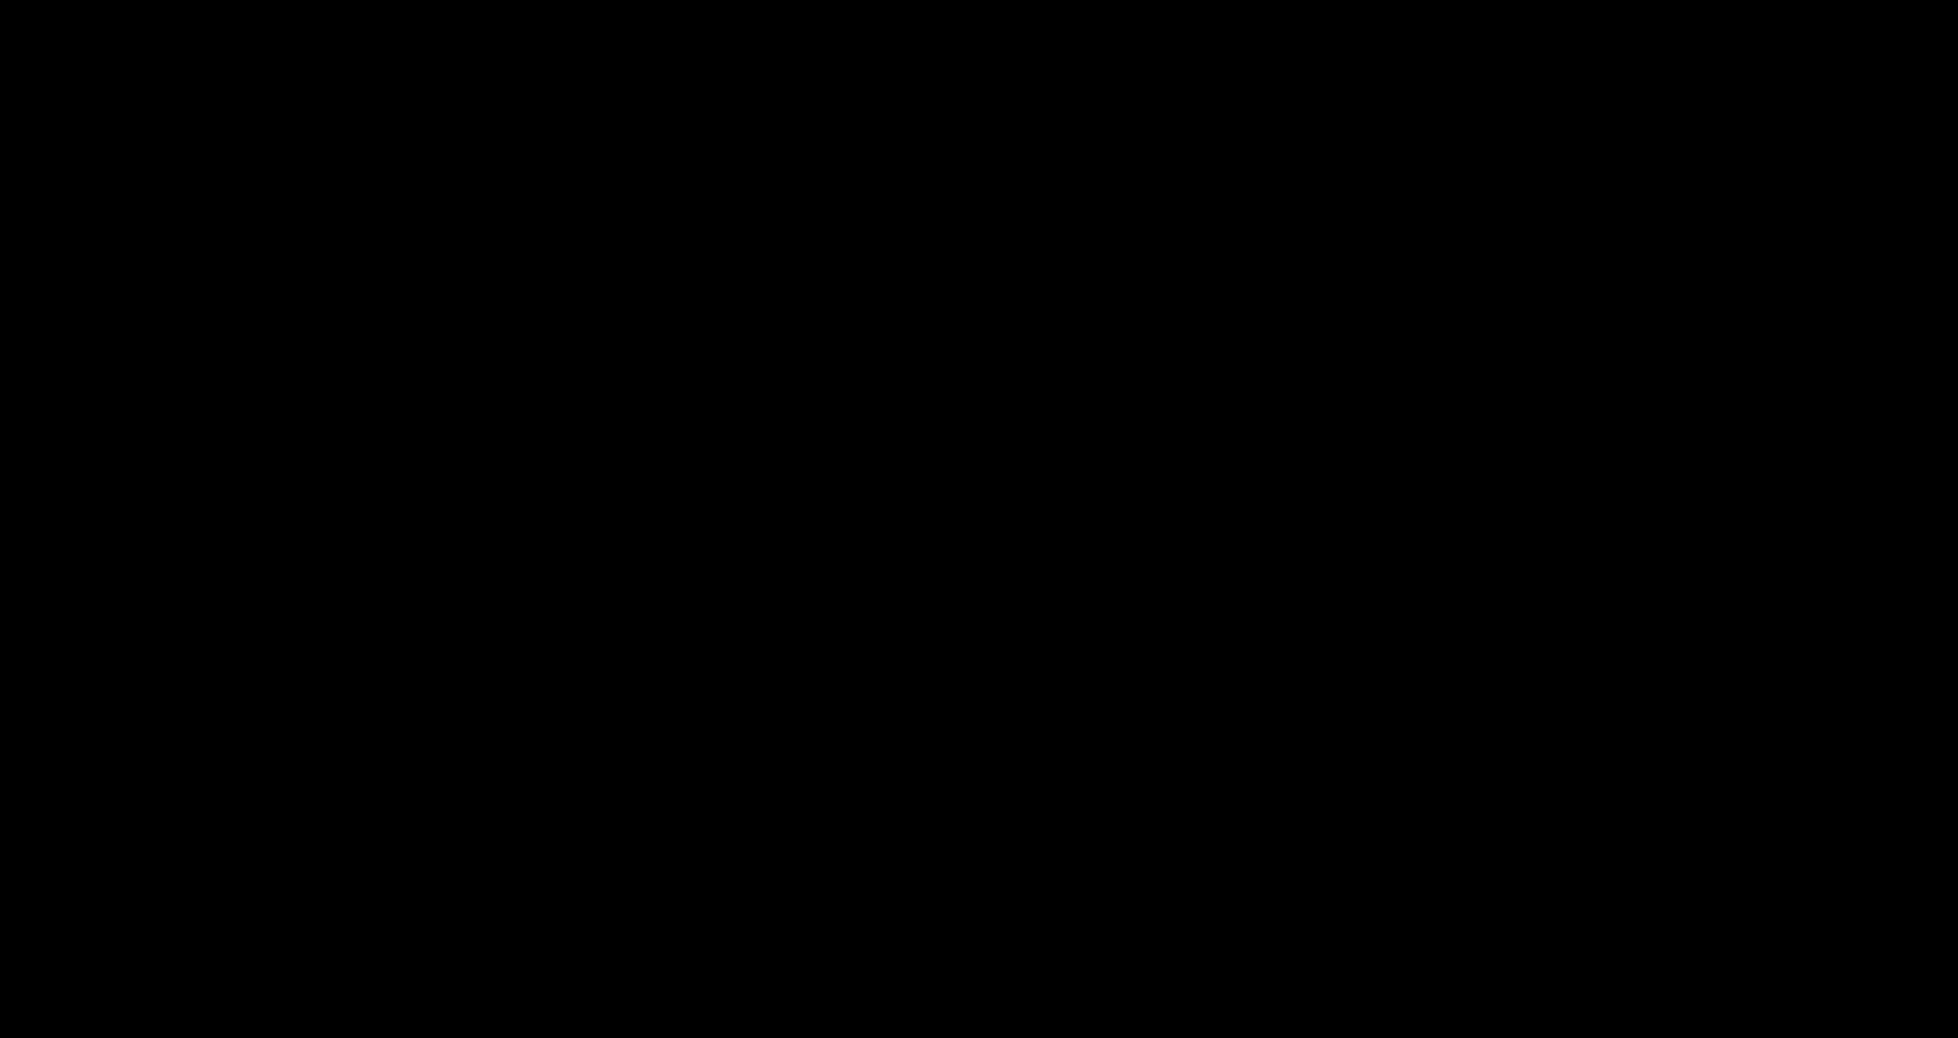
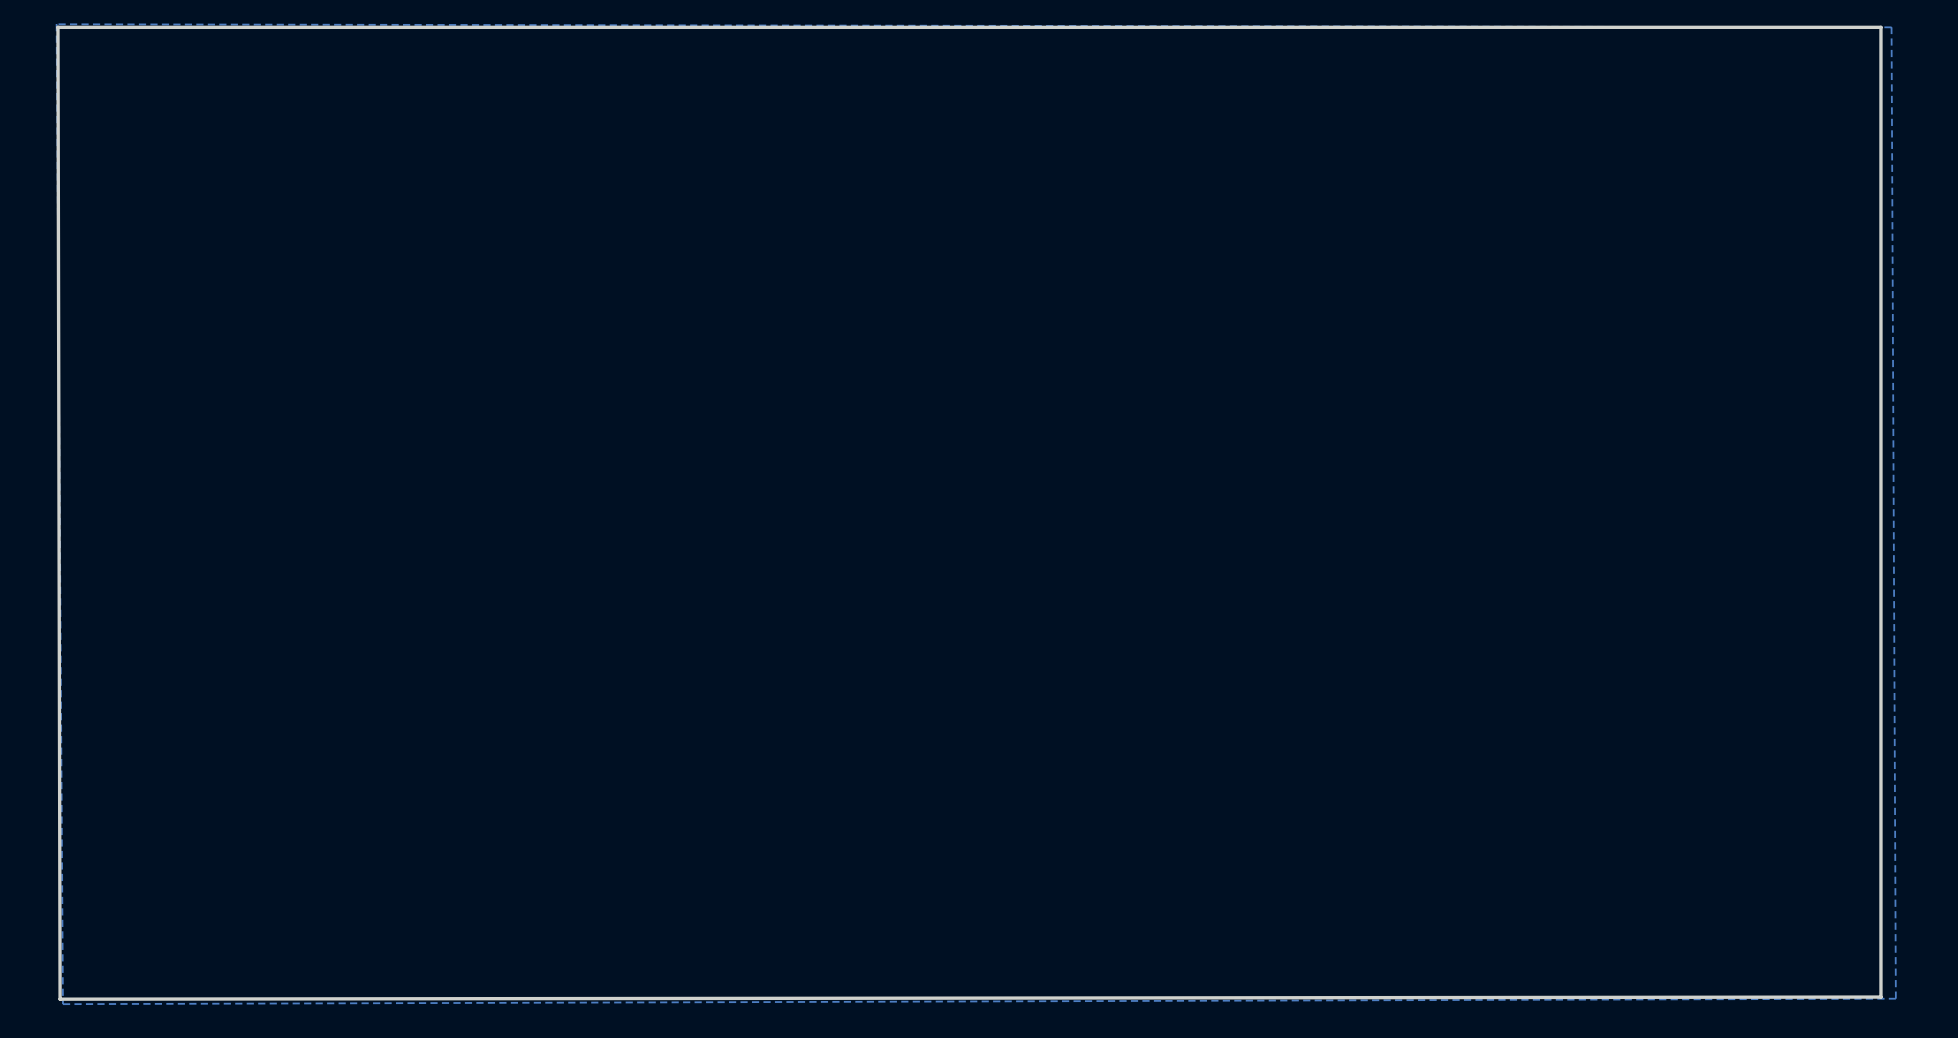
bottom zone outline: none -> (56, 24) (62, 1004) (1895, 998) (1891, 27) (56, 24)
board edge: none -> (57, 27) (60, 999) (1880, 997) (1880, 27) (57, 27)

